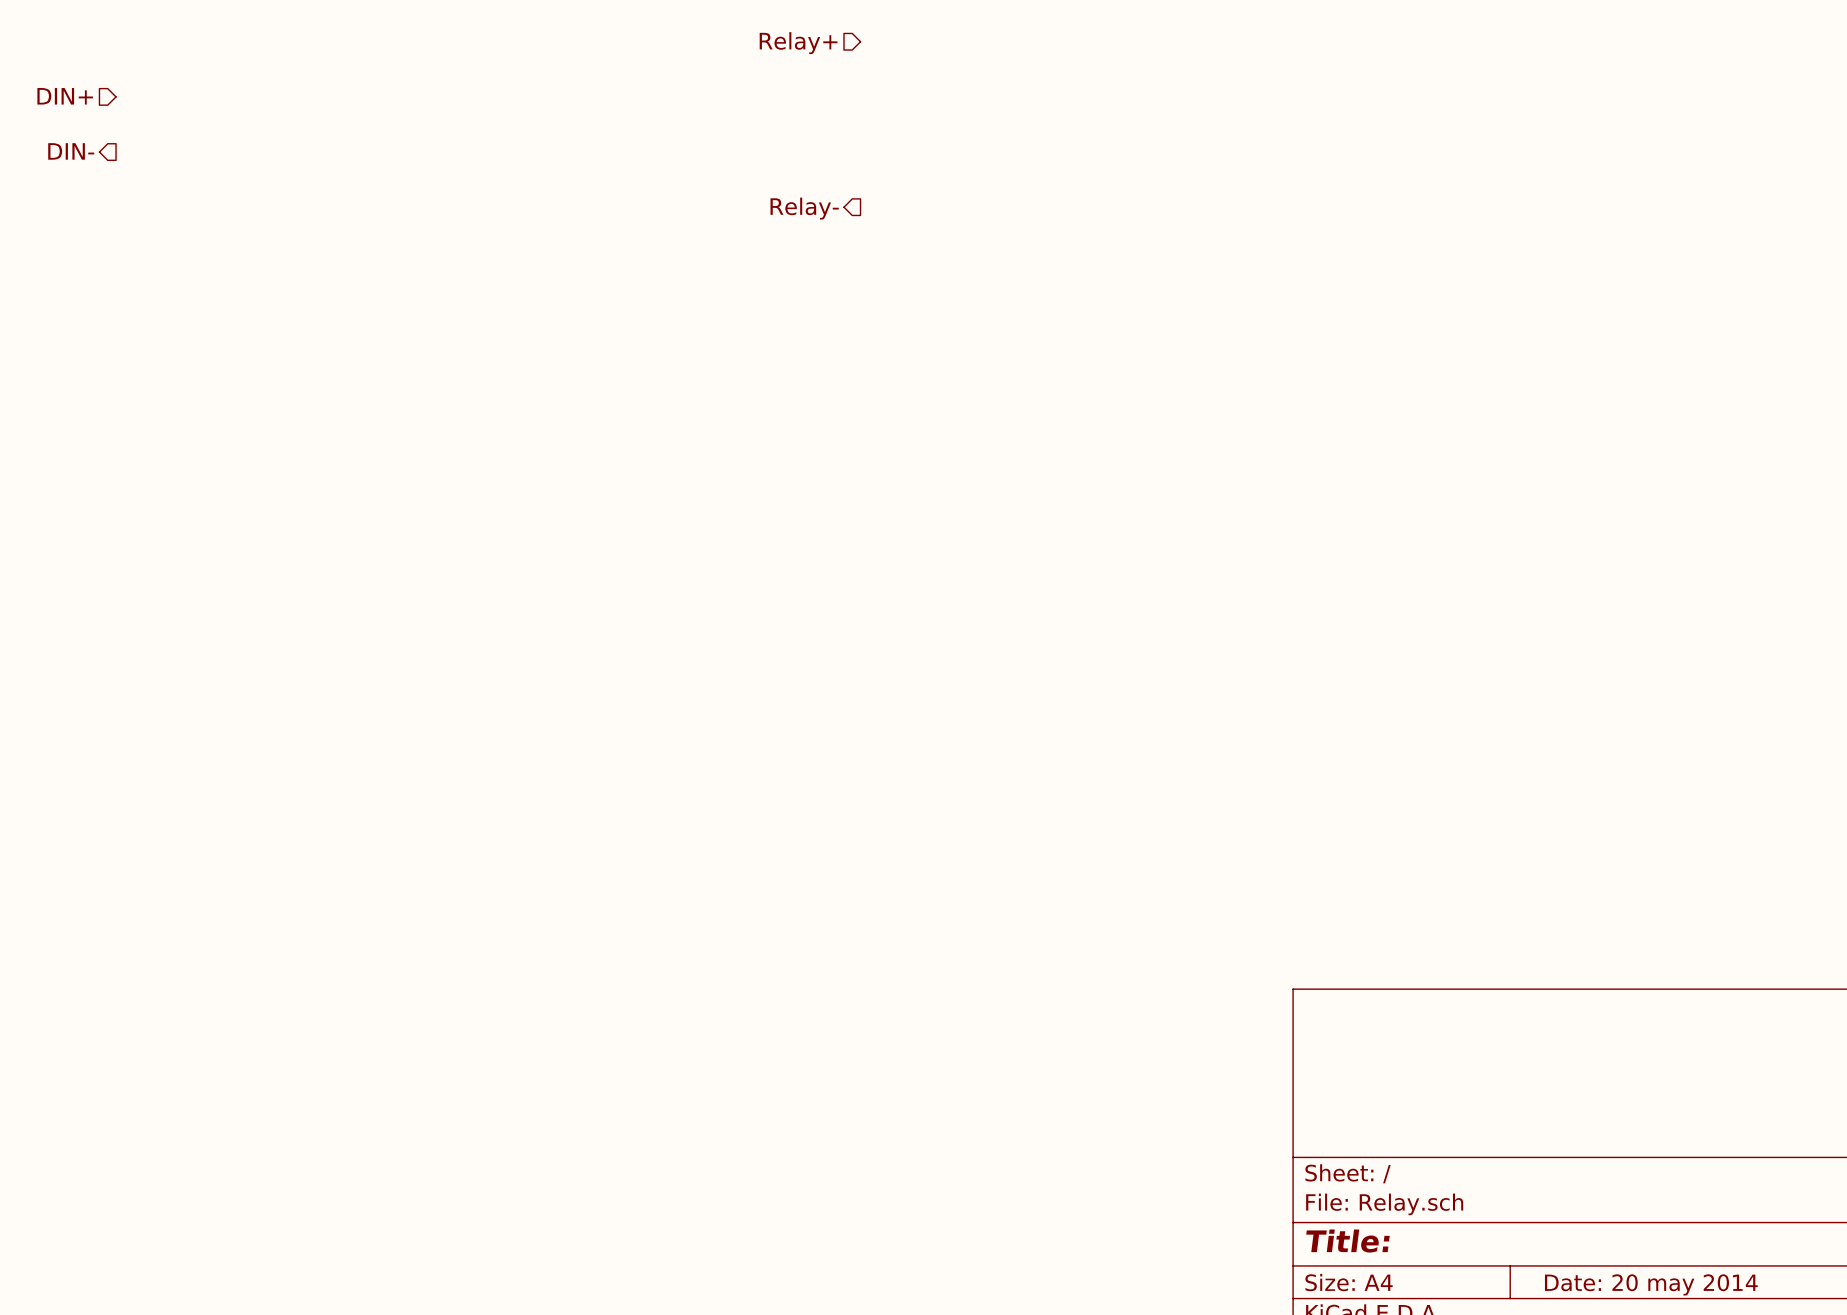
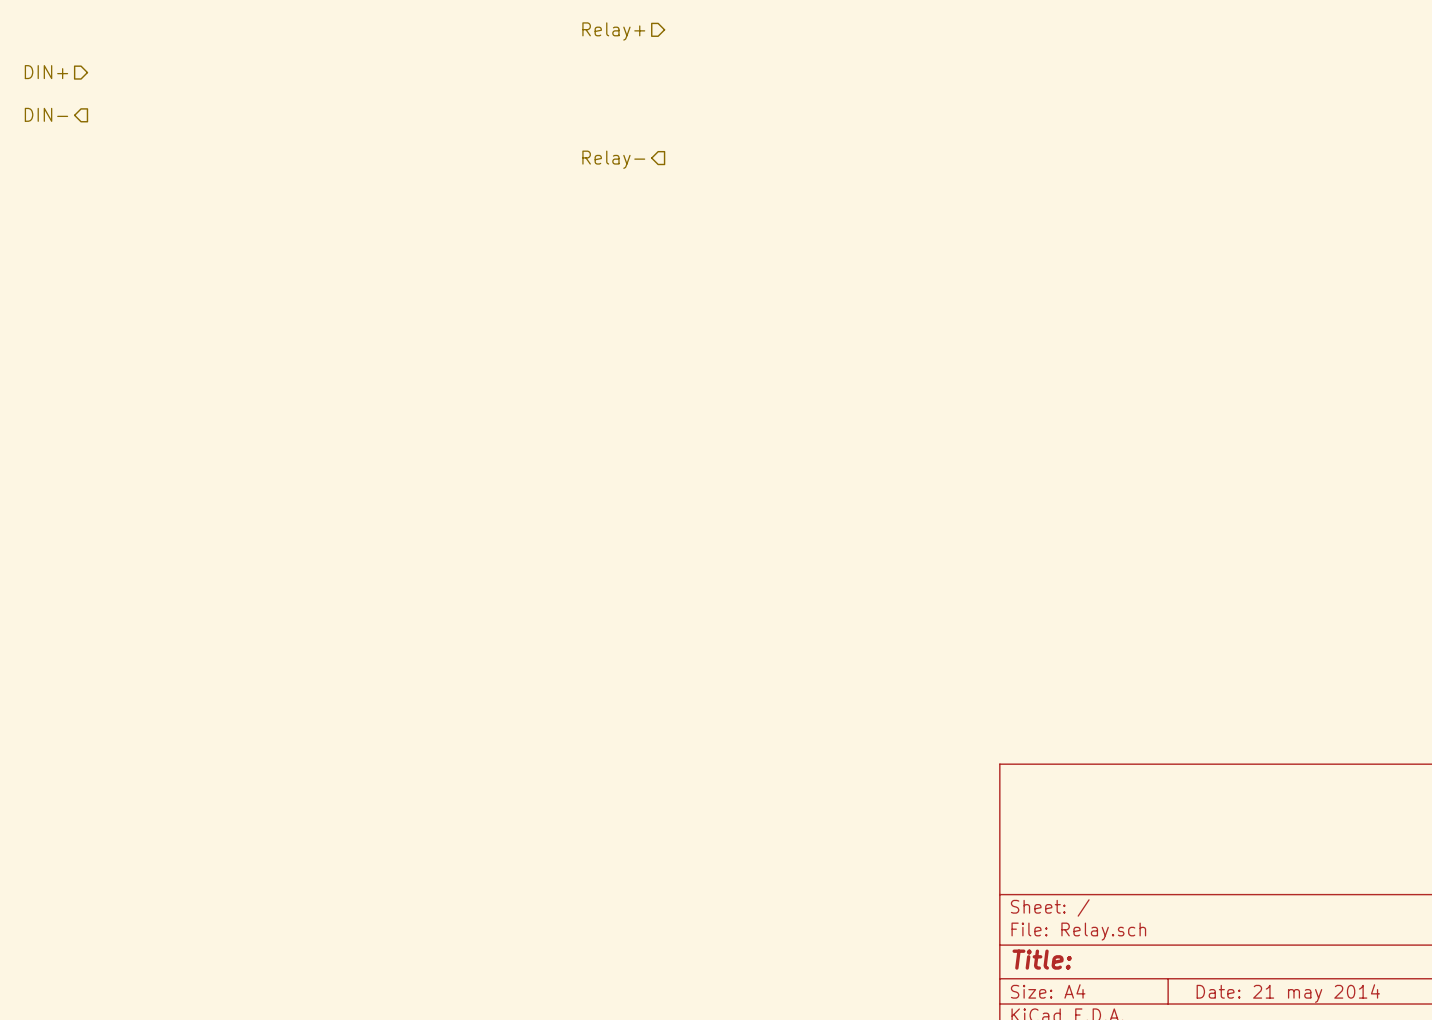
title block: Date: 20 may 2014 (1651, 1284) -> Date: 21 may 2014 (1288, 993)

